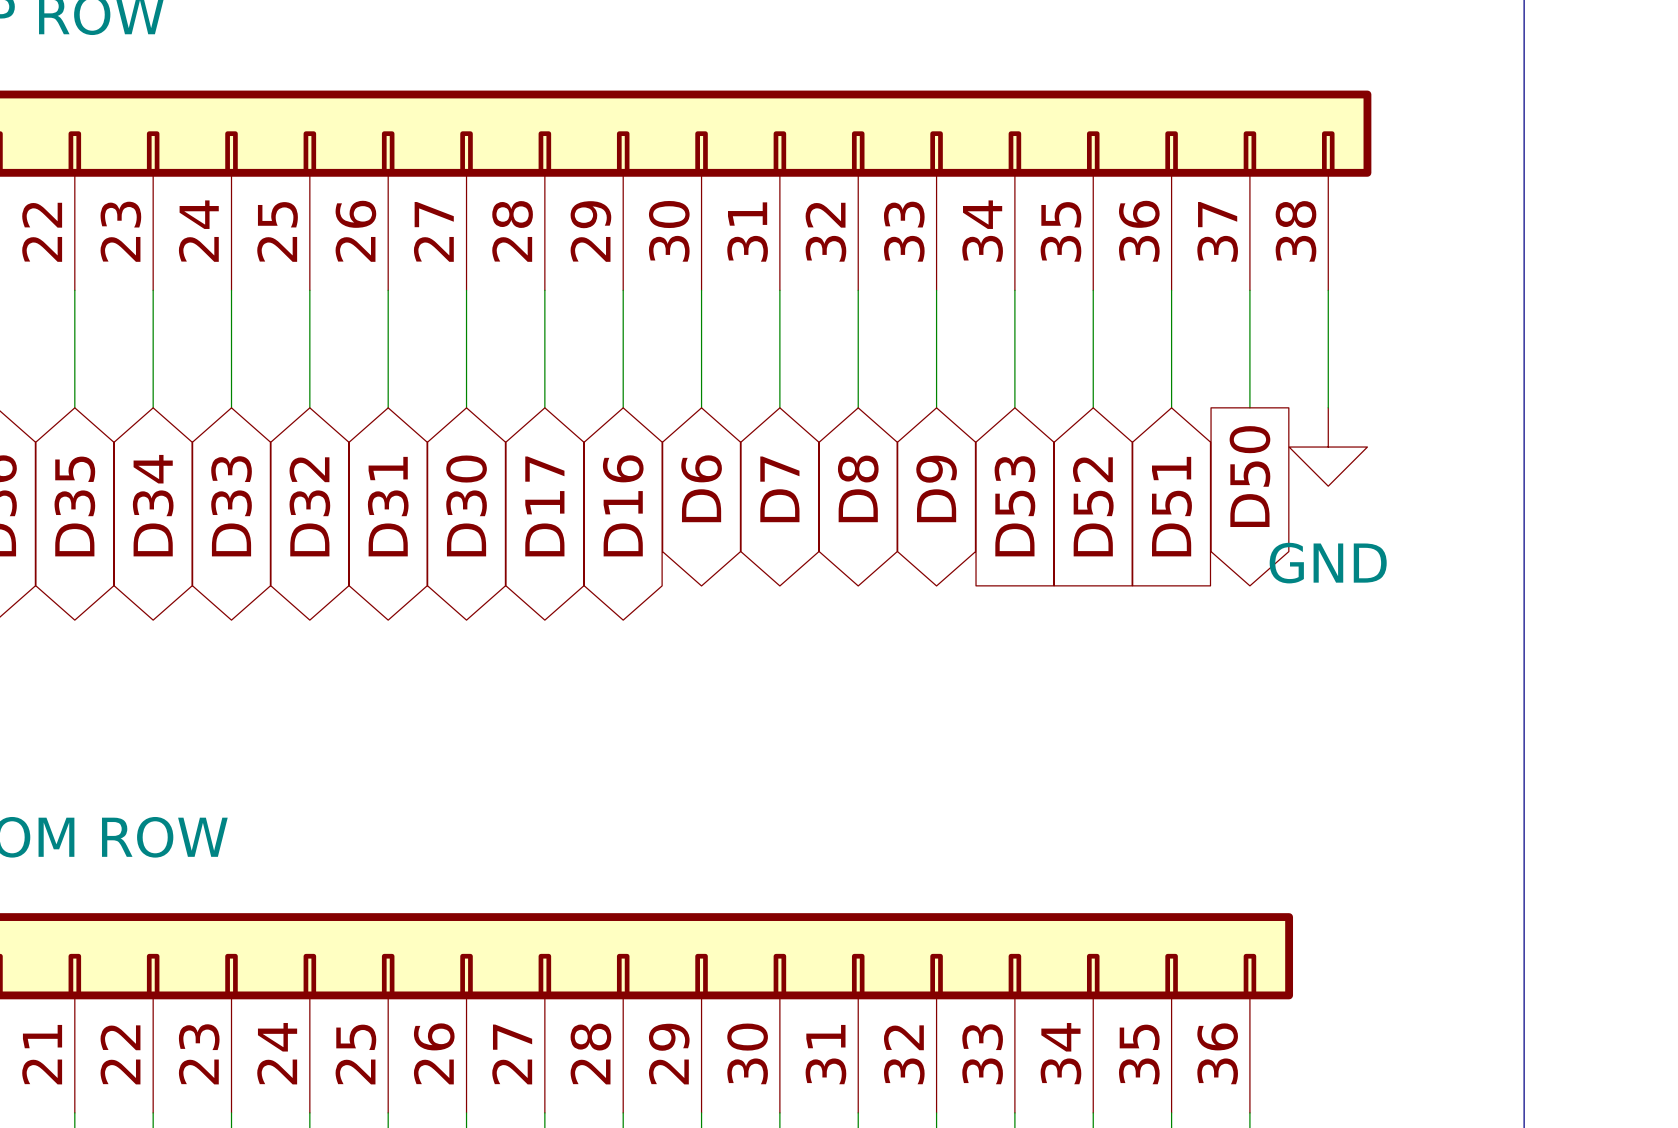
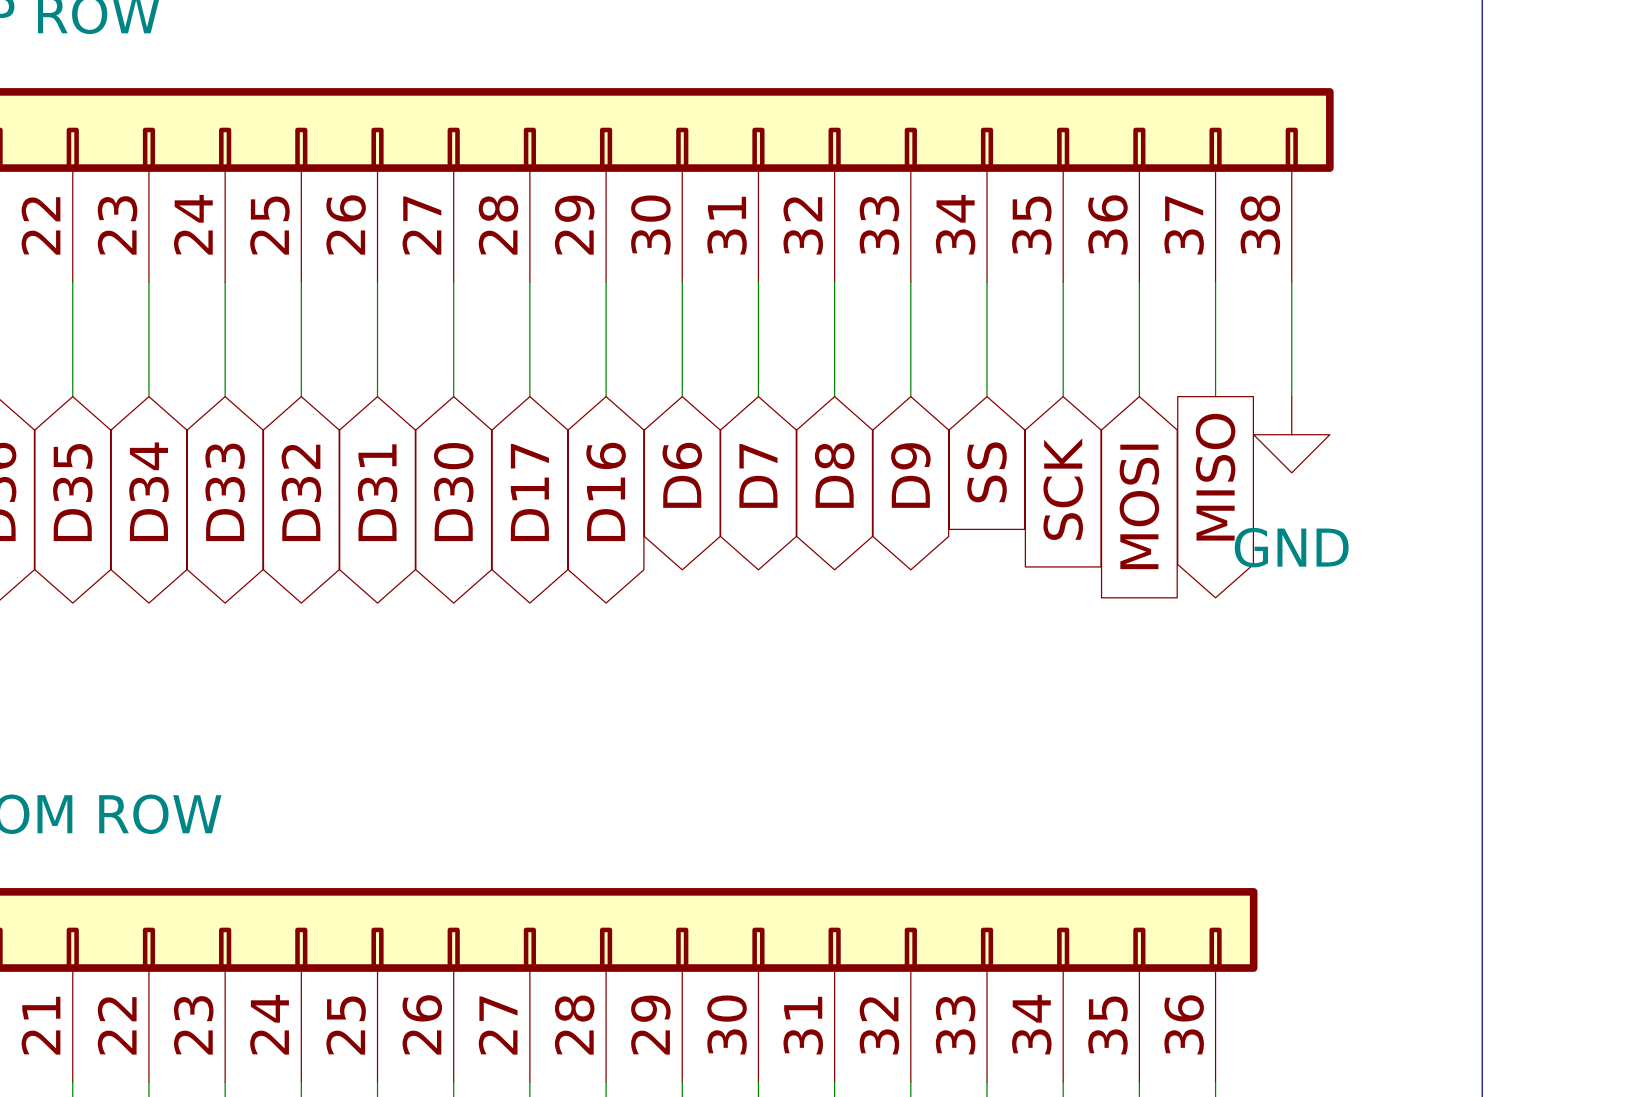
global label: D50 (1249, 476) -> MISO (1215, 477)
global label: D53 (1014, 506) -> SS (987, 472)
global label: D52 (1093, 506) -> SCK (1063, 489)
global label: D51 (1171, 506) -> MOSI (1139, 506)

